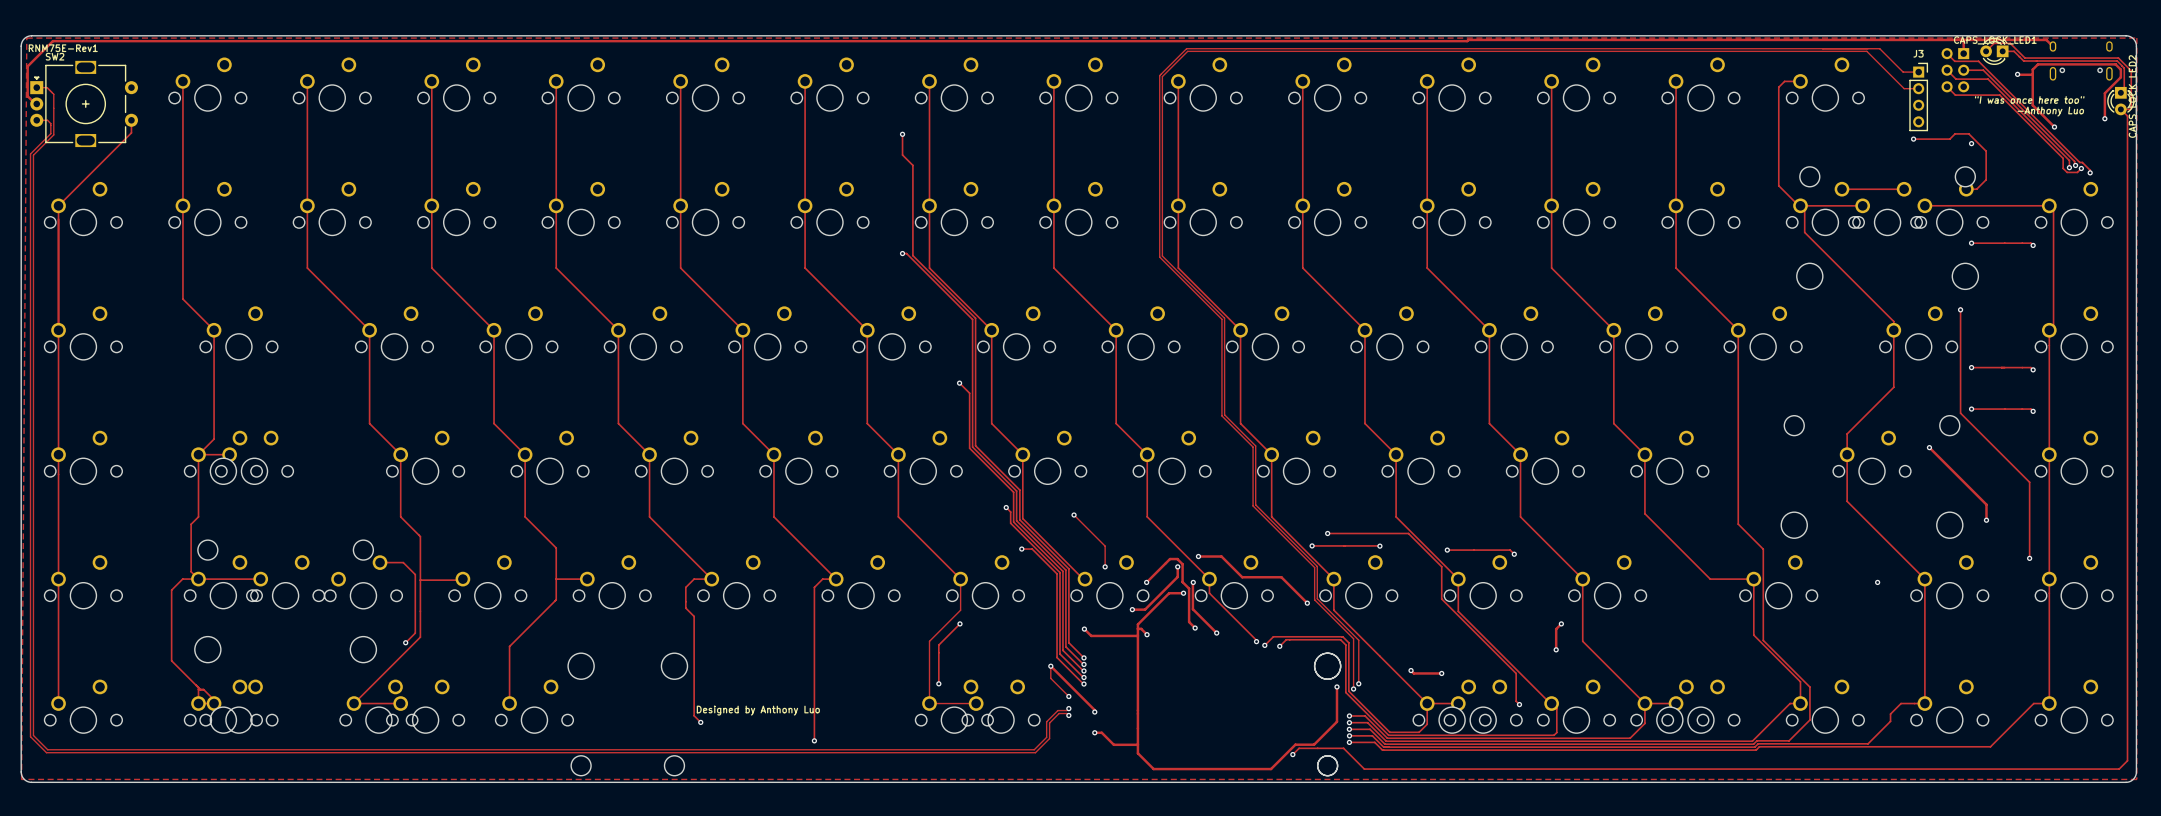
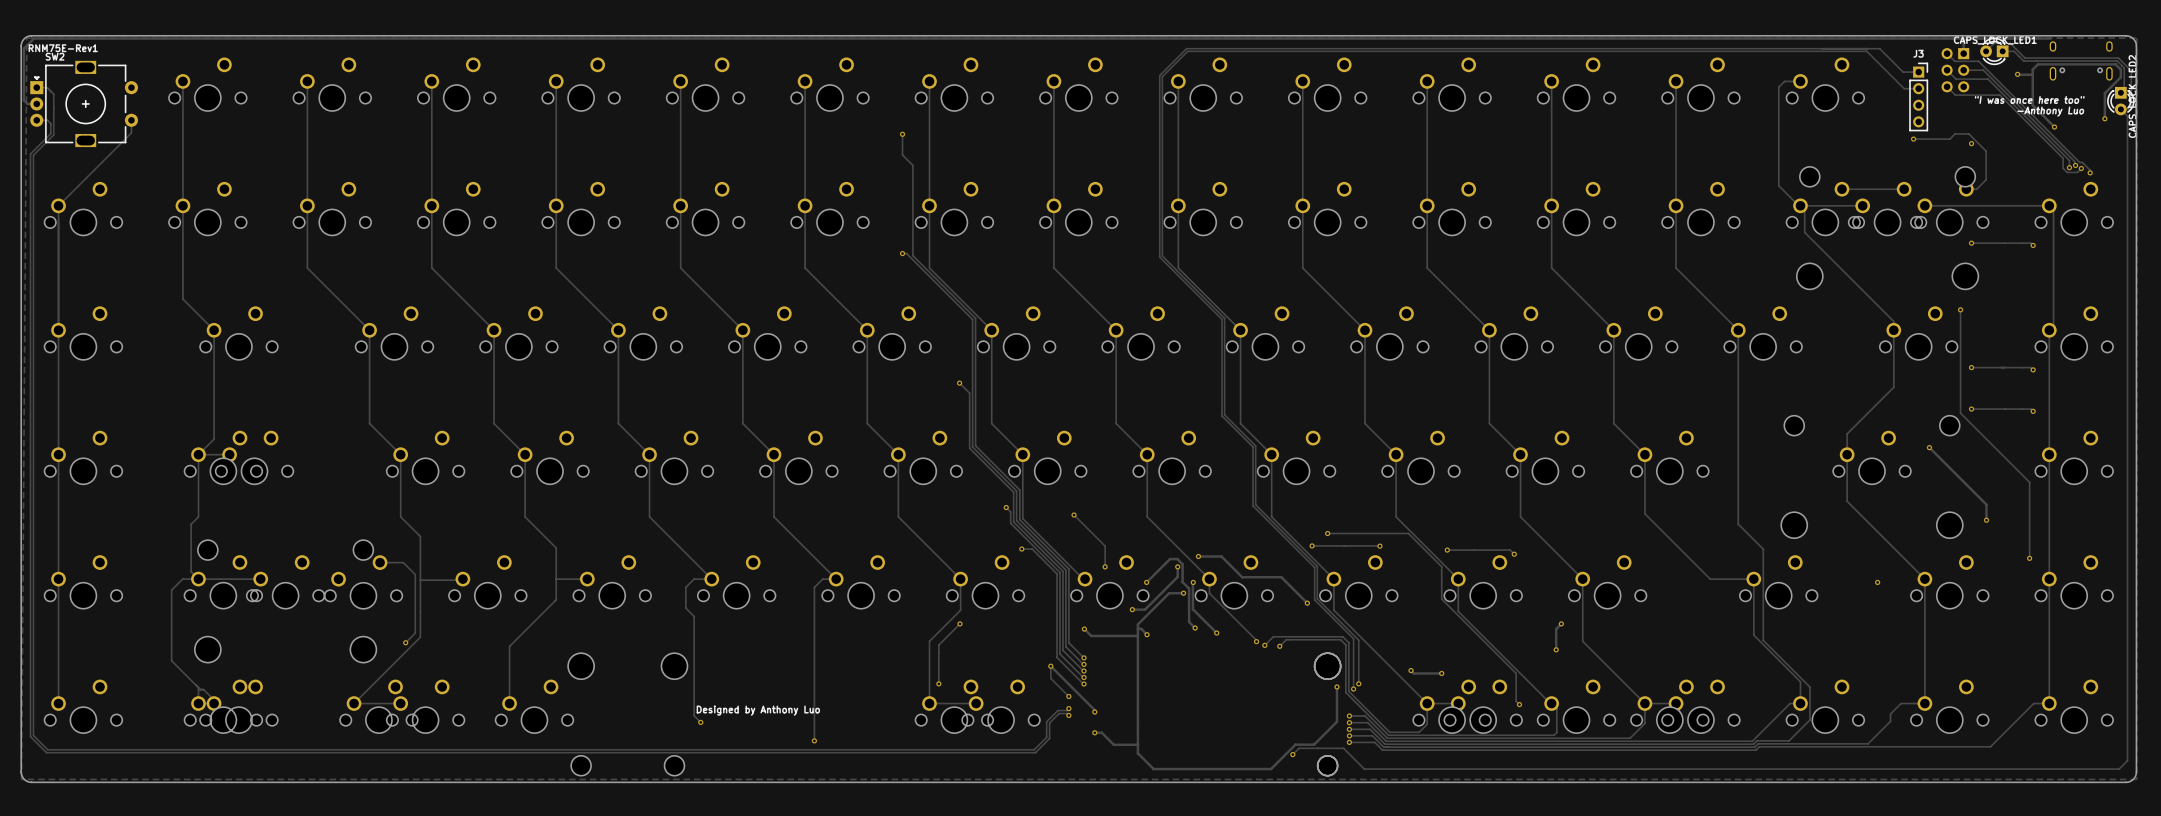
track: (2052, 46) (2046, 39) (52, 41) (27, 66) (27, 96) (35, 103) -> (2050, 38) (34, 38) (23, 48) (23, 100) (27, 103) (35, 103)

